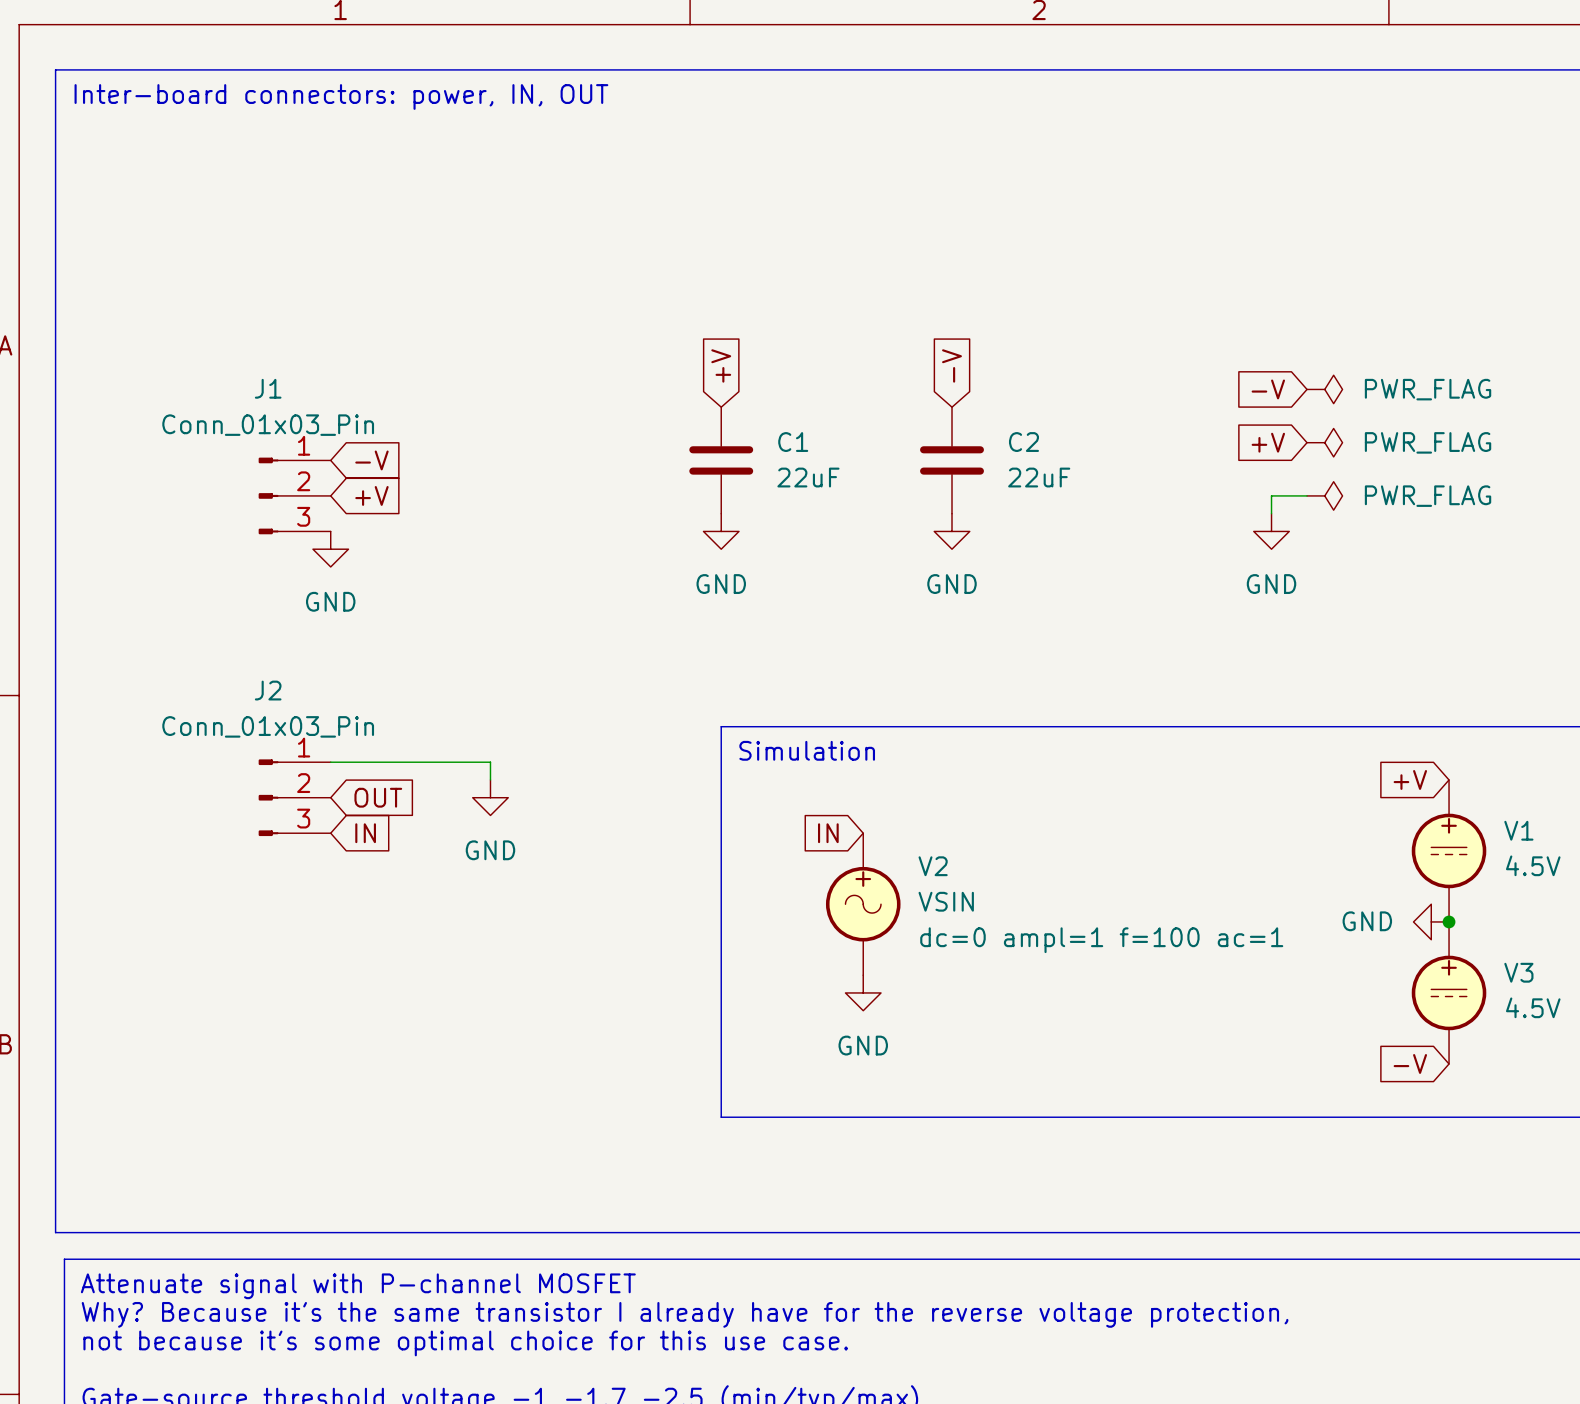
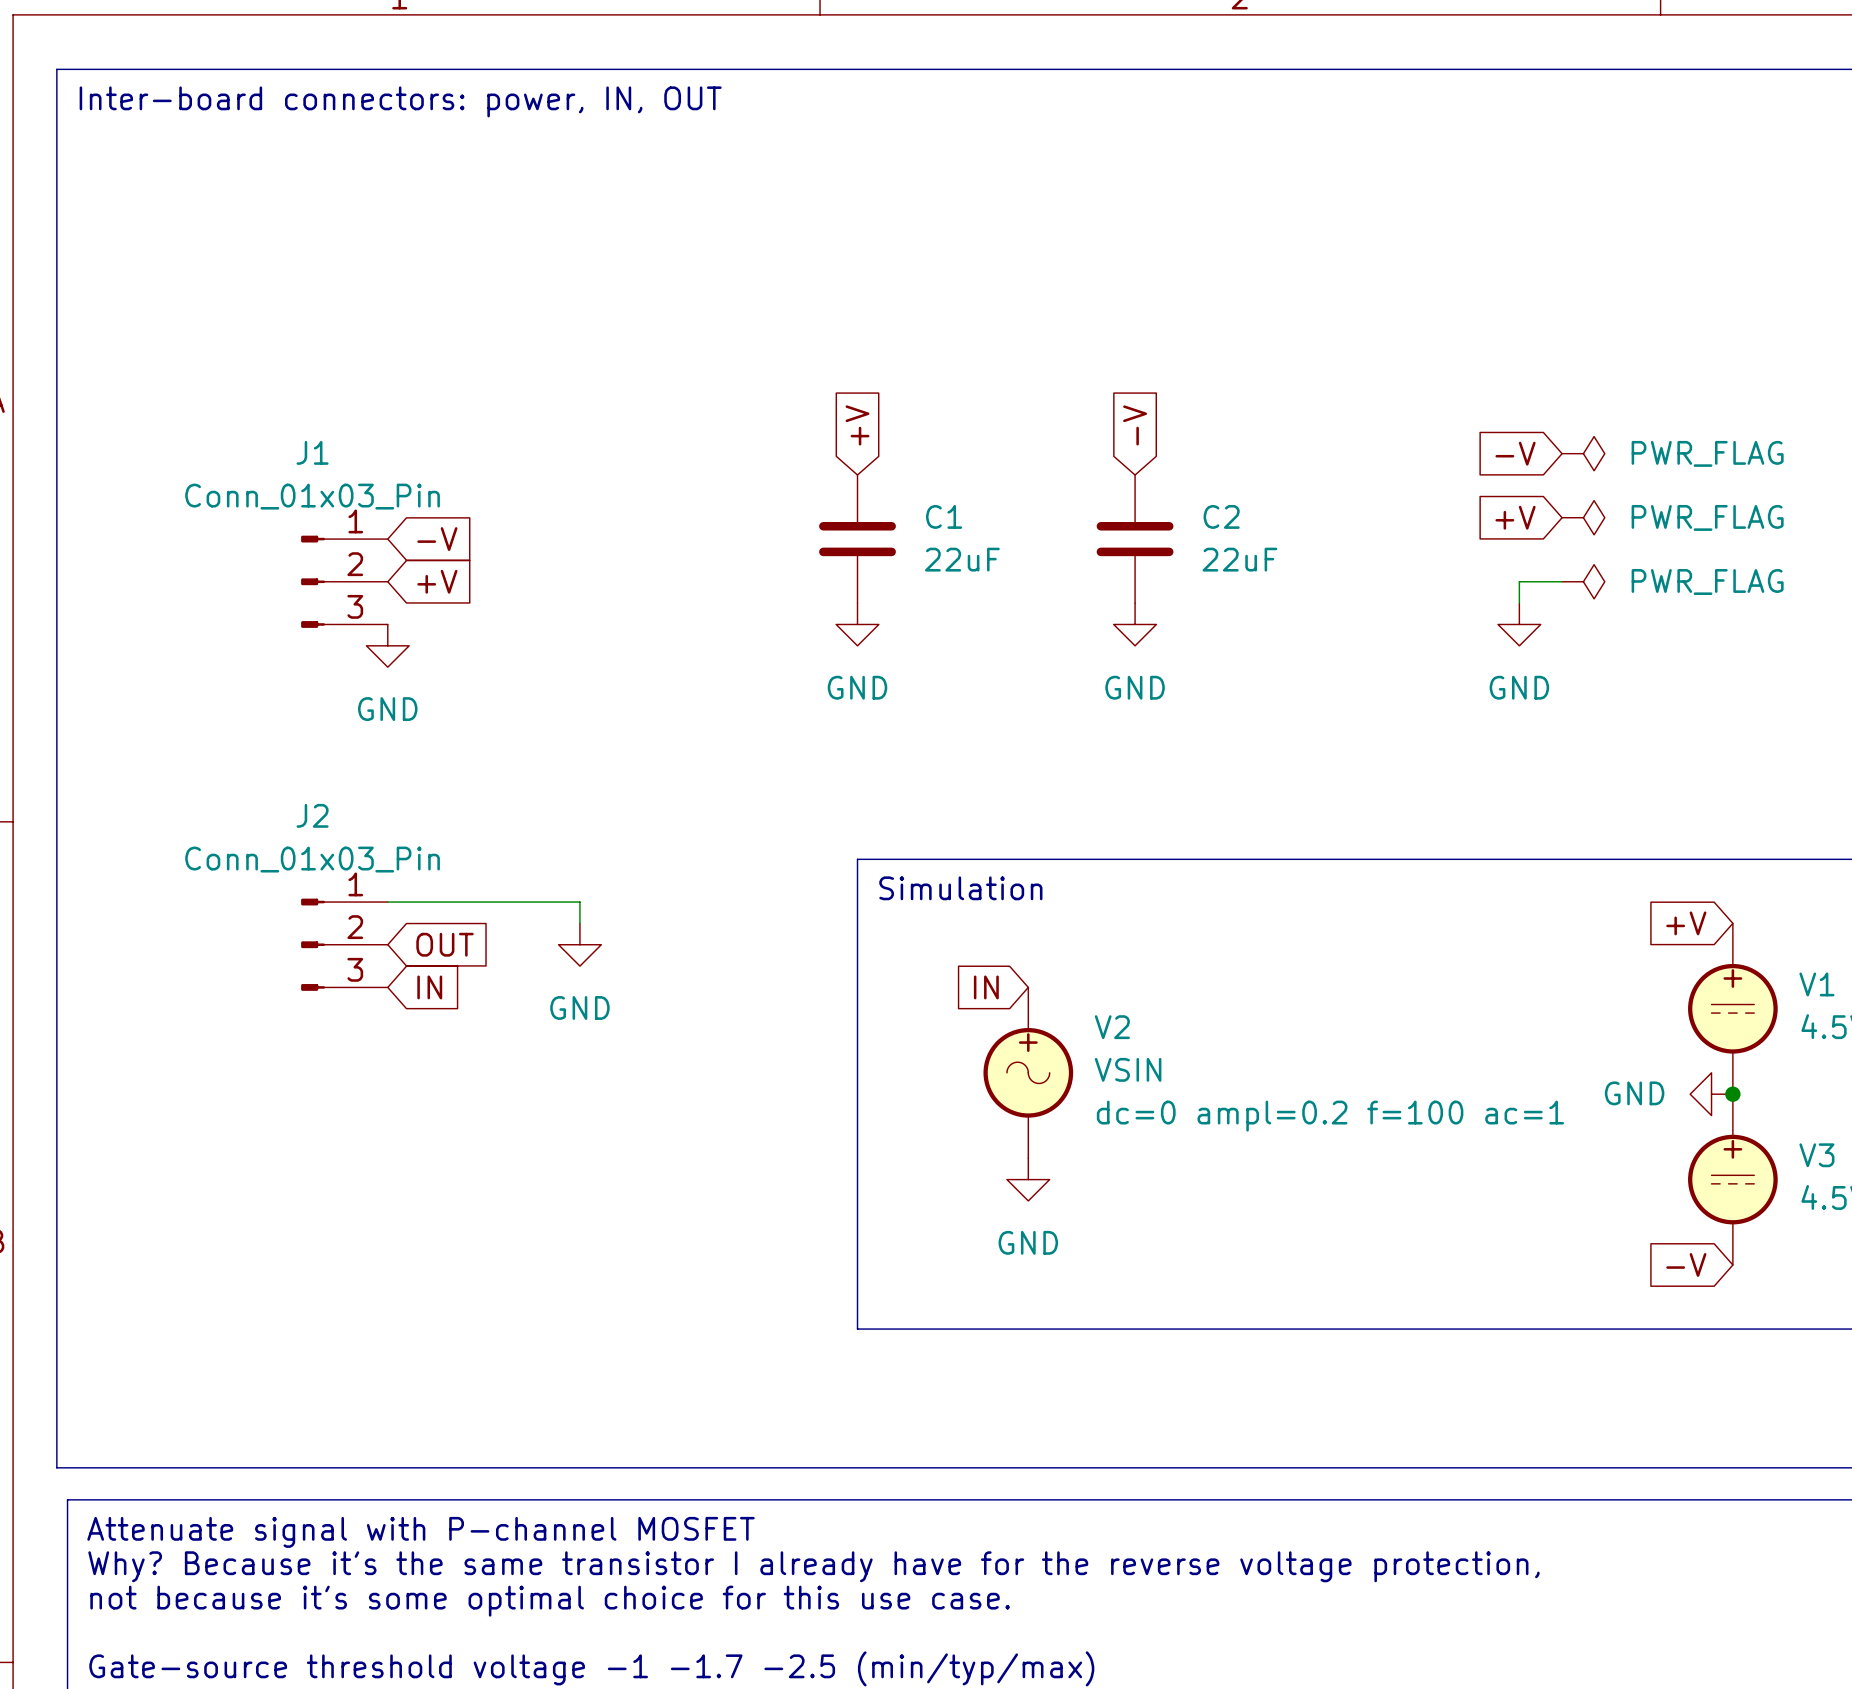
V2 text: dc=0 ampl=1 f=100 ac=1 (1101, 940) -> dc=0 ampl=0.2 f=100 ac=1 (1330, 1116)

